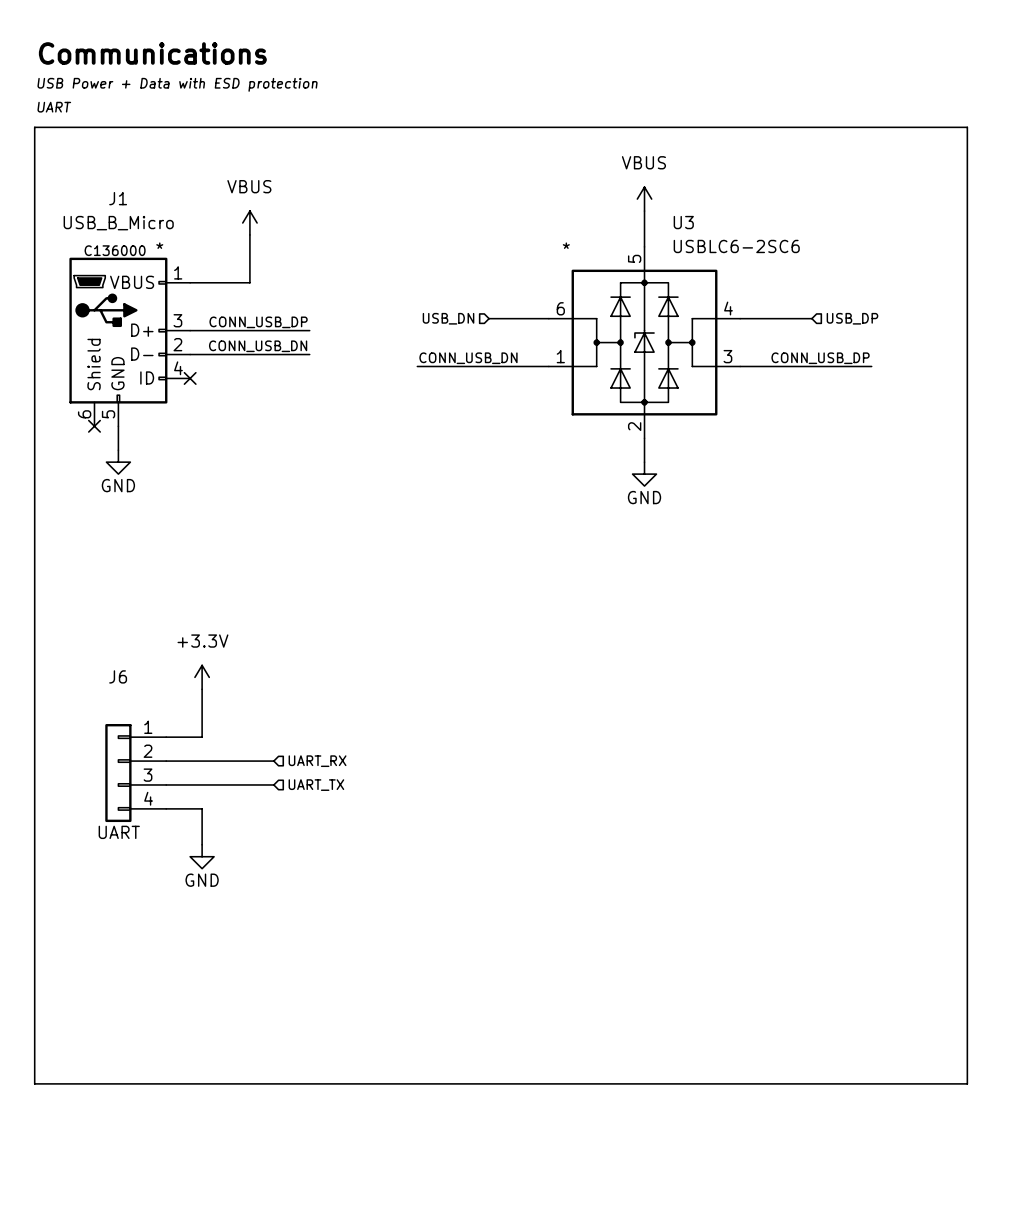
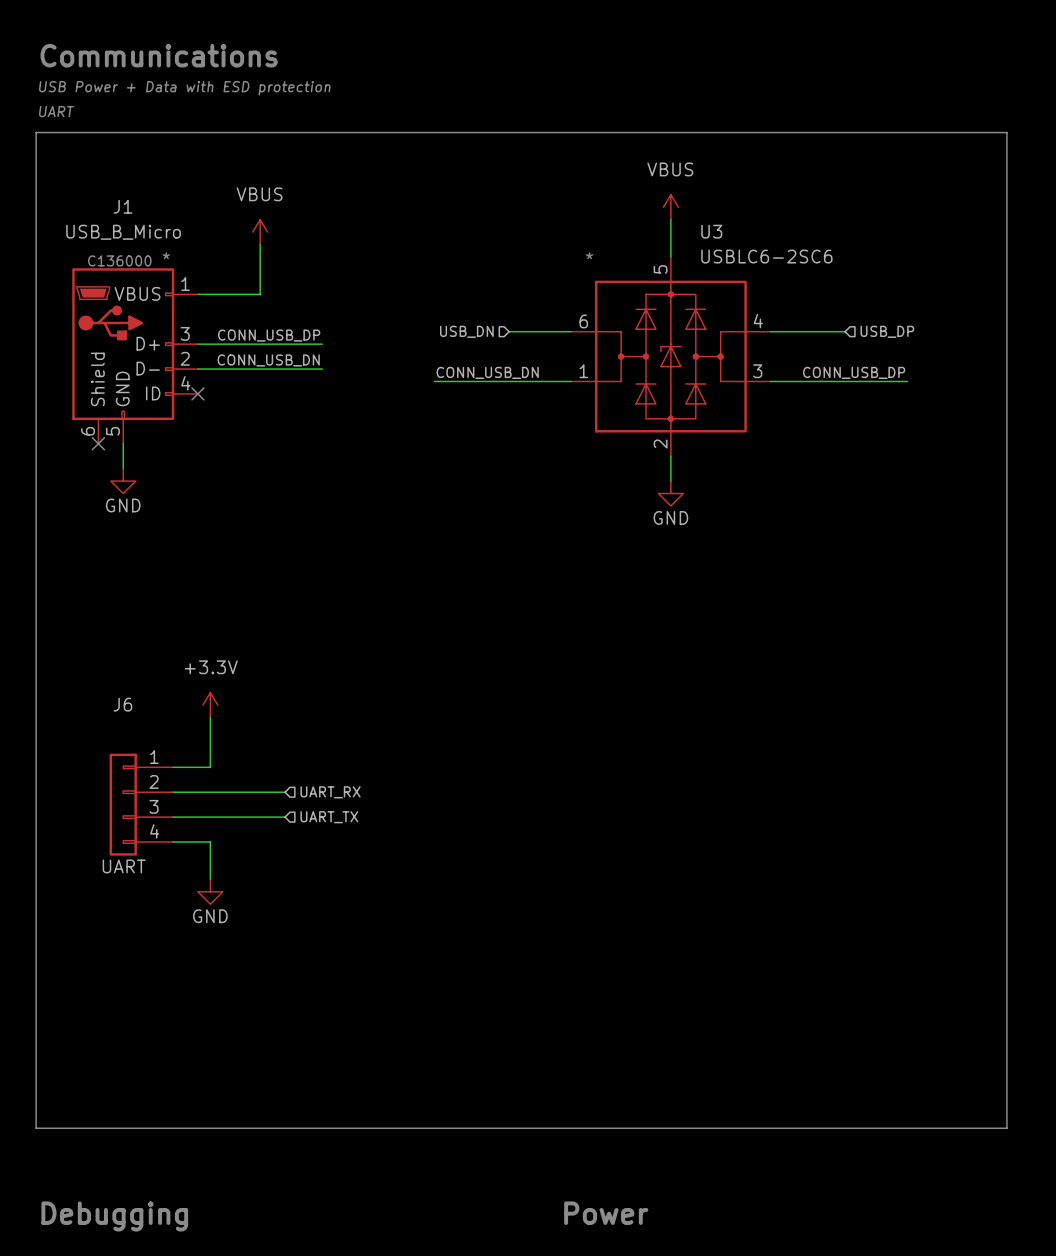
text: none -> Power (606, 1213)
text: none -> Debugging (114, 1216)

